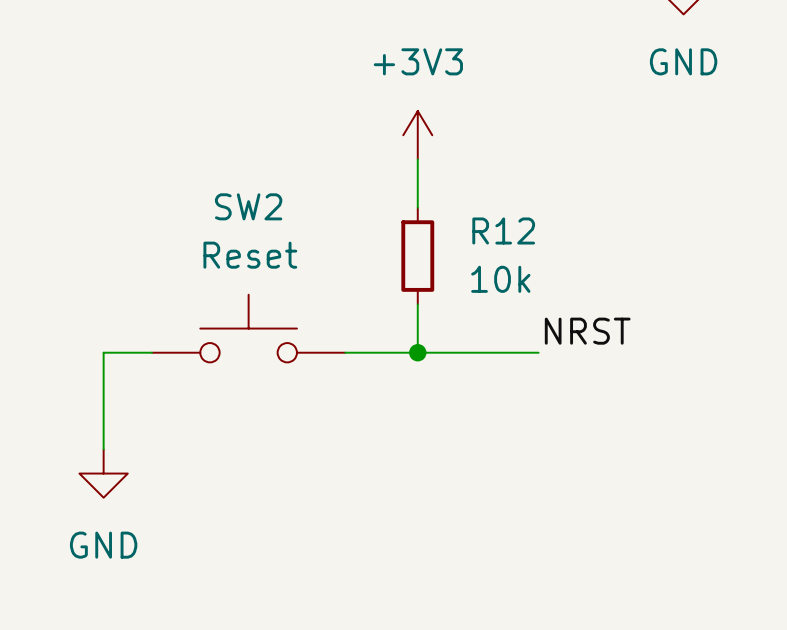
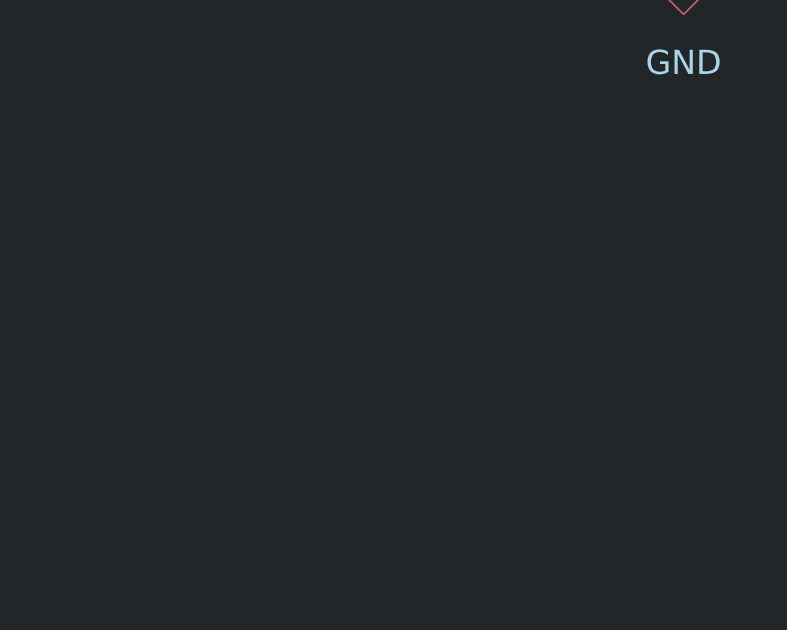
power symbol: +3V3 (417, 135) -> none
wire: (417, 159) (417, 207) -> none
R12: 10k (417, 256) -> none
wire: (417, 304) (417, 352) -> none
SW2: Reset (248, 328) -> none
label: NRST (587, 331) -> none
wire: (151, 352) (103, 352) (103, 449) -> none
wire: (345, 352) (538, 352) -> none
junction: (417, 352) -> none
power symbol: GND (103, 473) -> none

